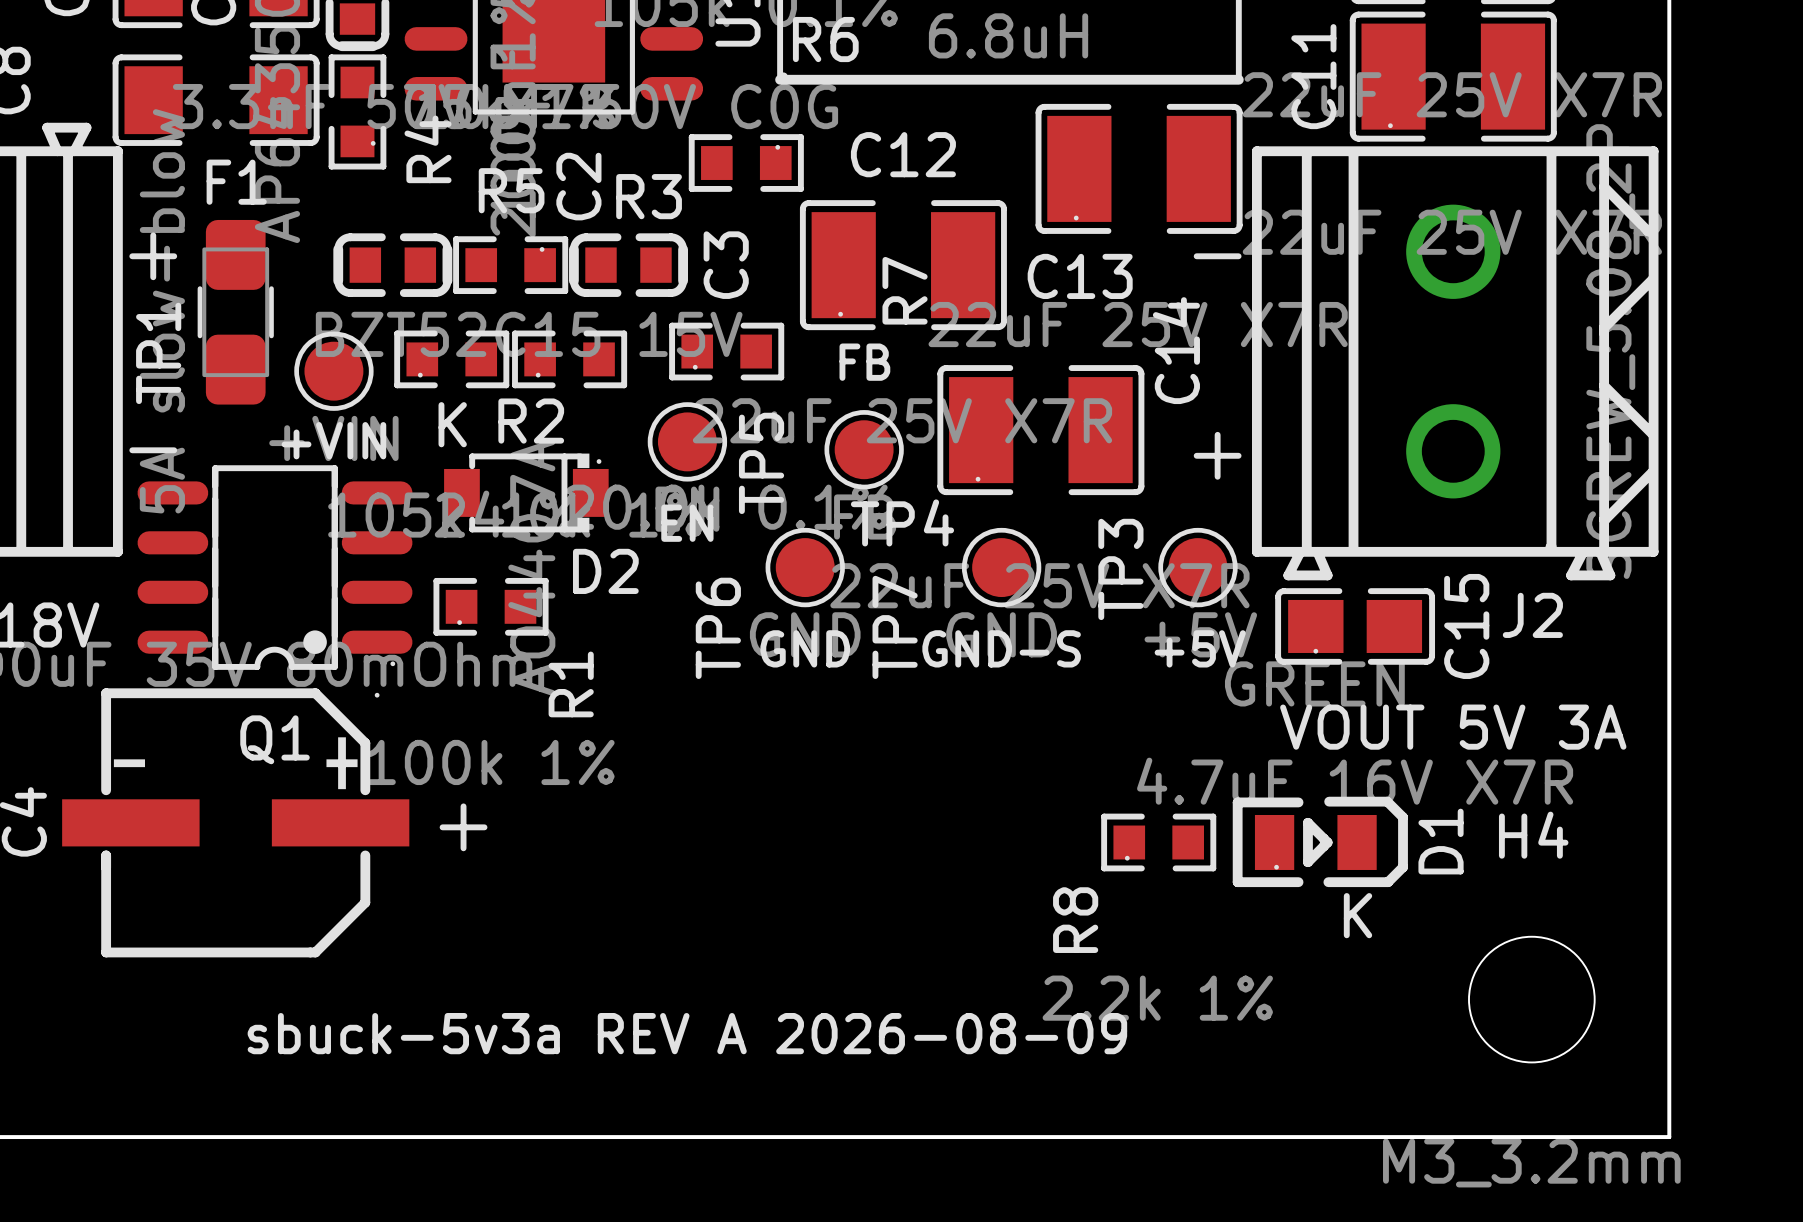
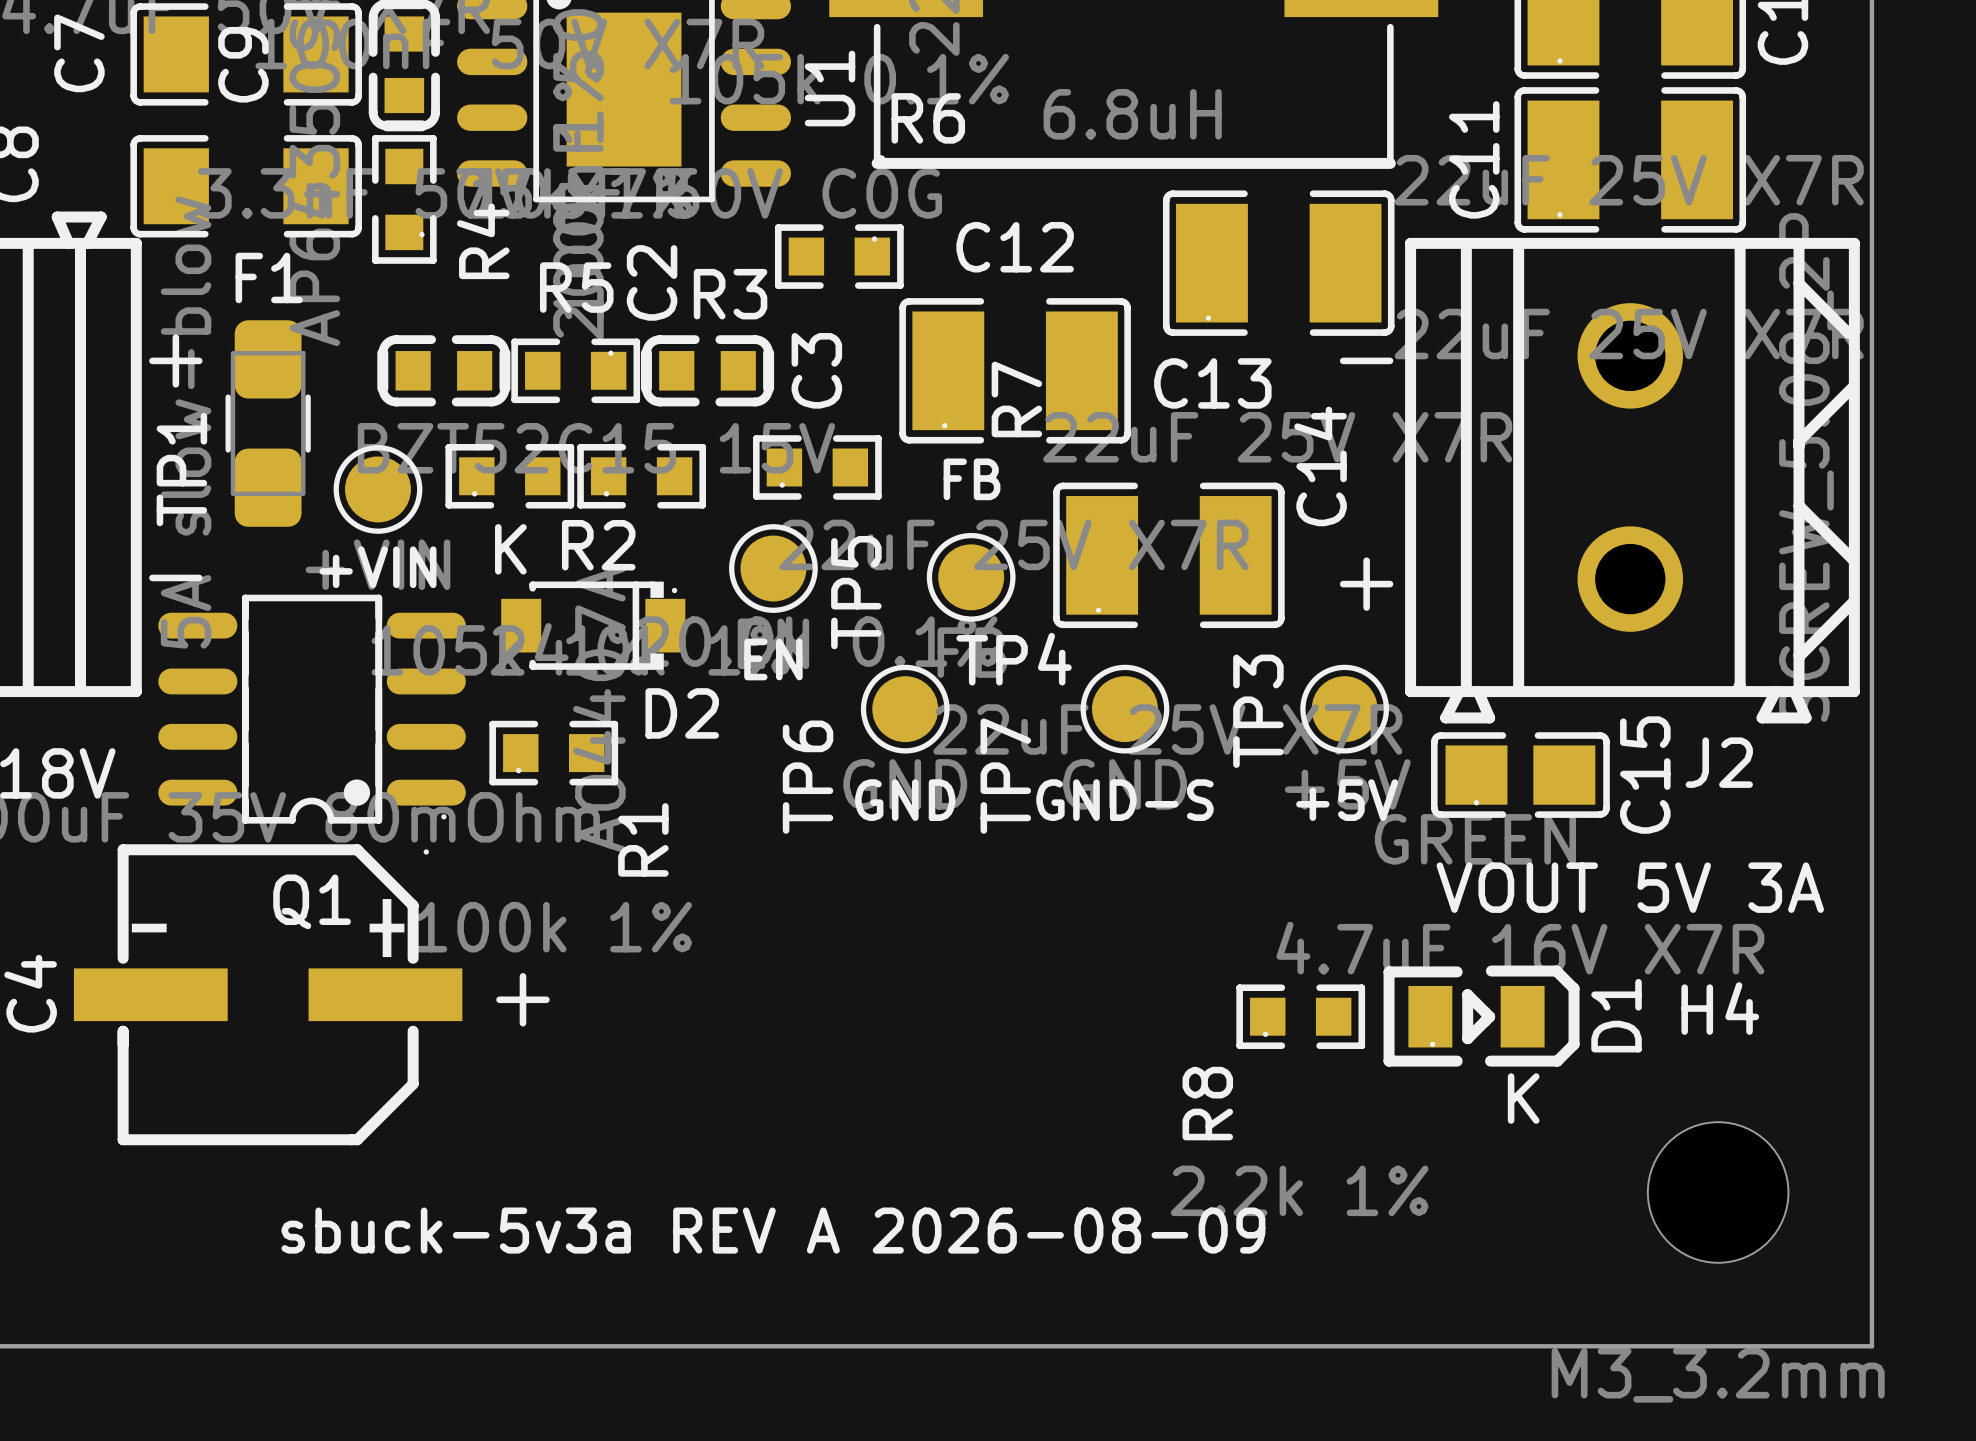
D2 footprint: [444, 453, 609, 533] -> [501, 581, 686, 670]

